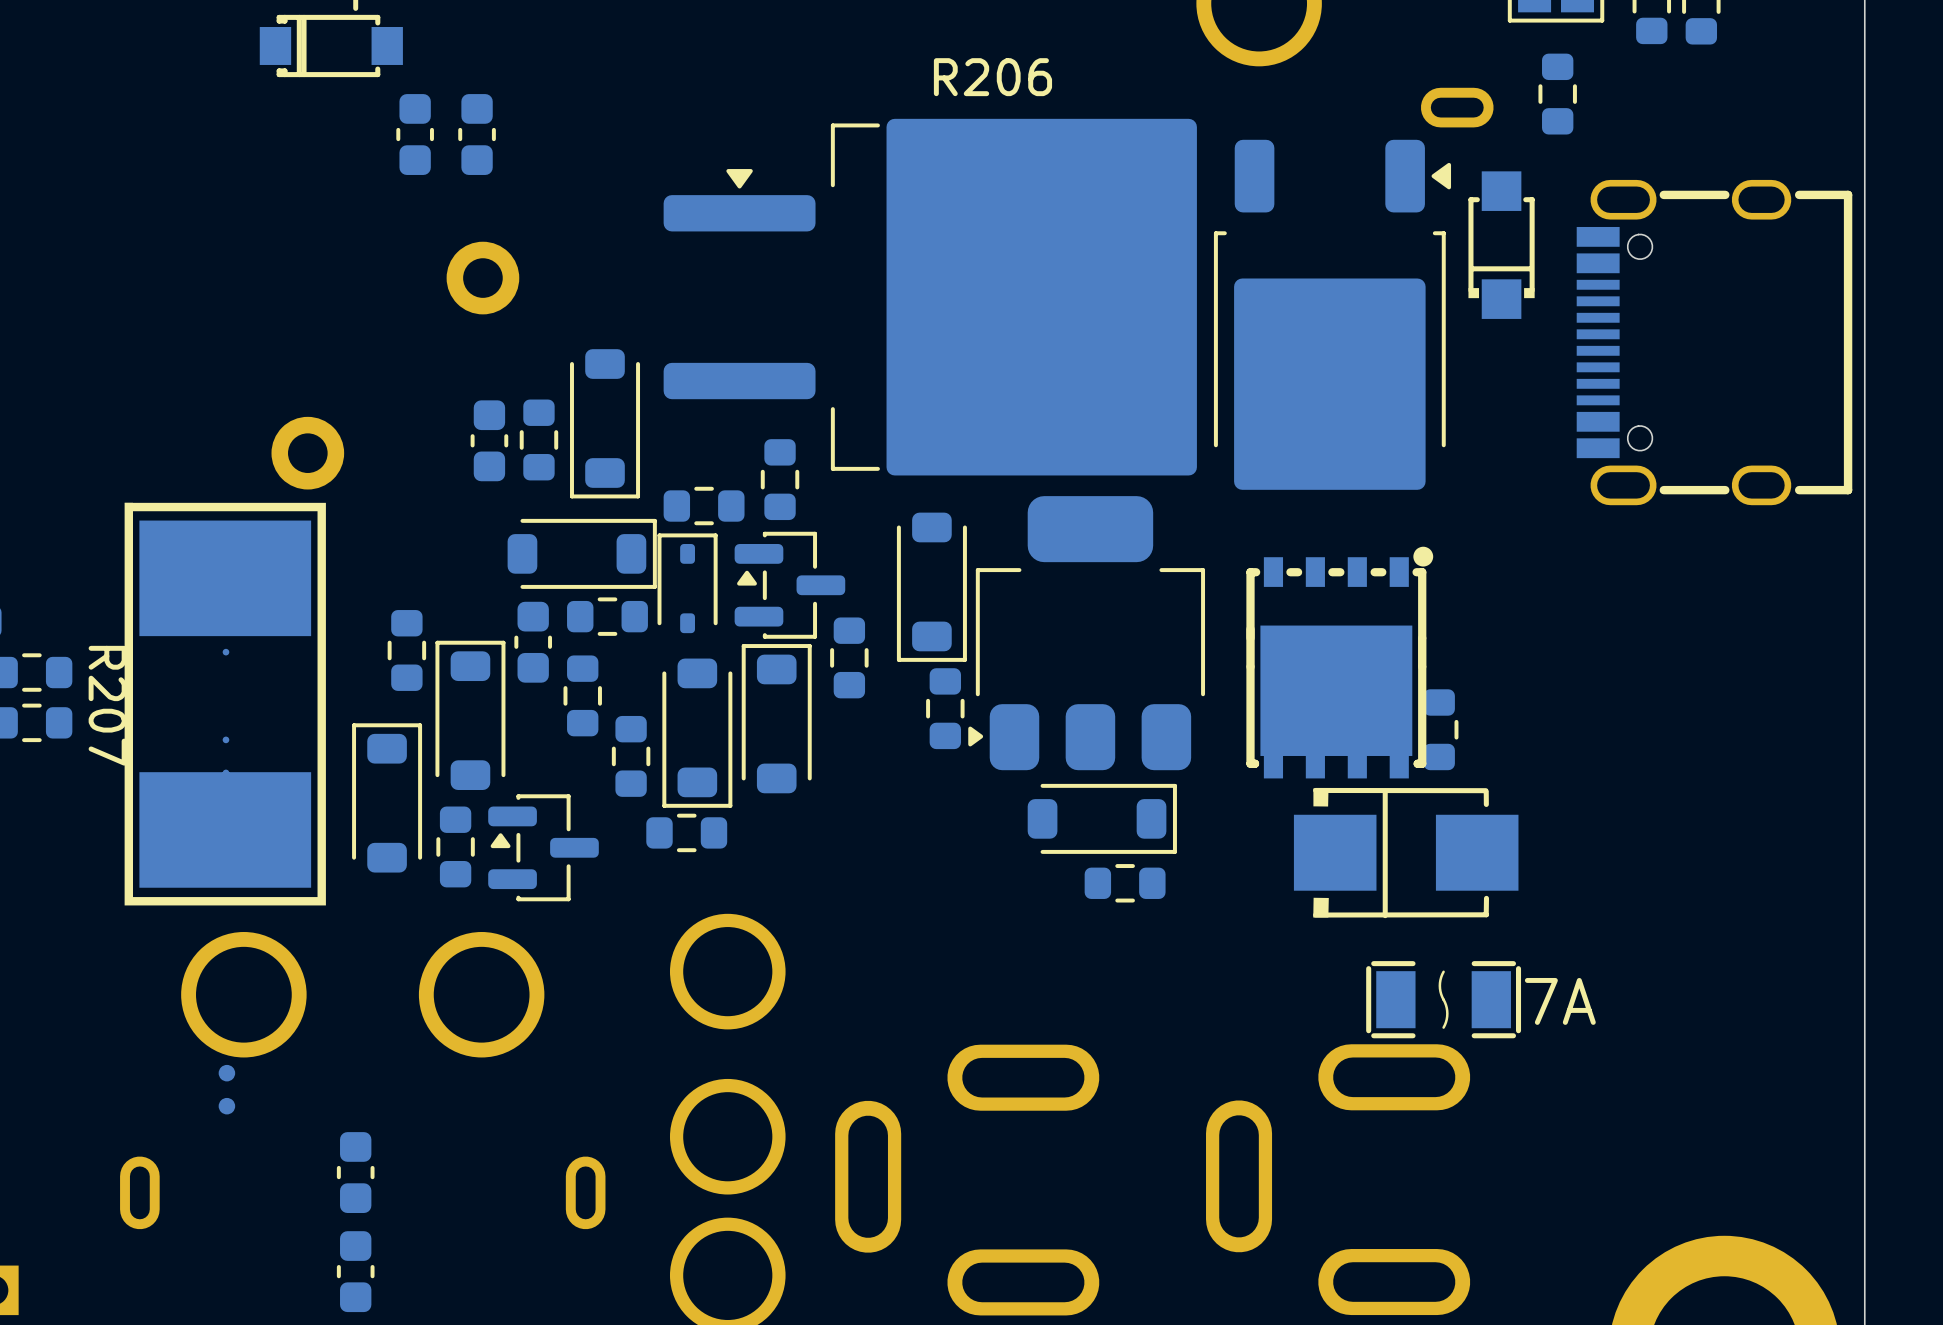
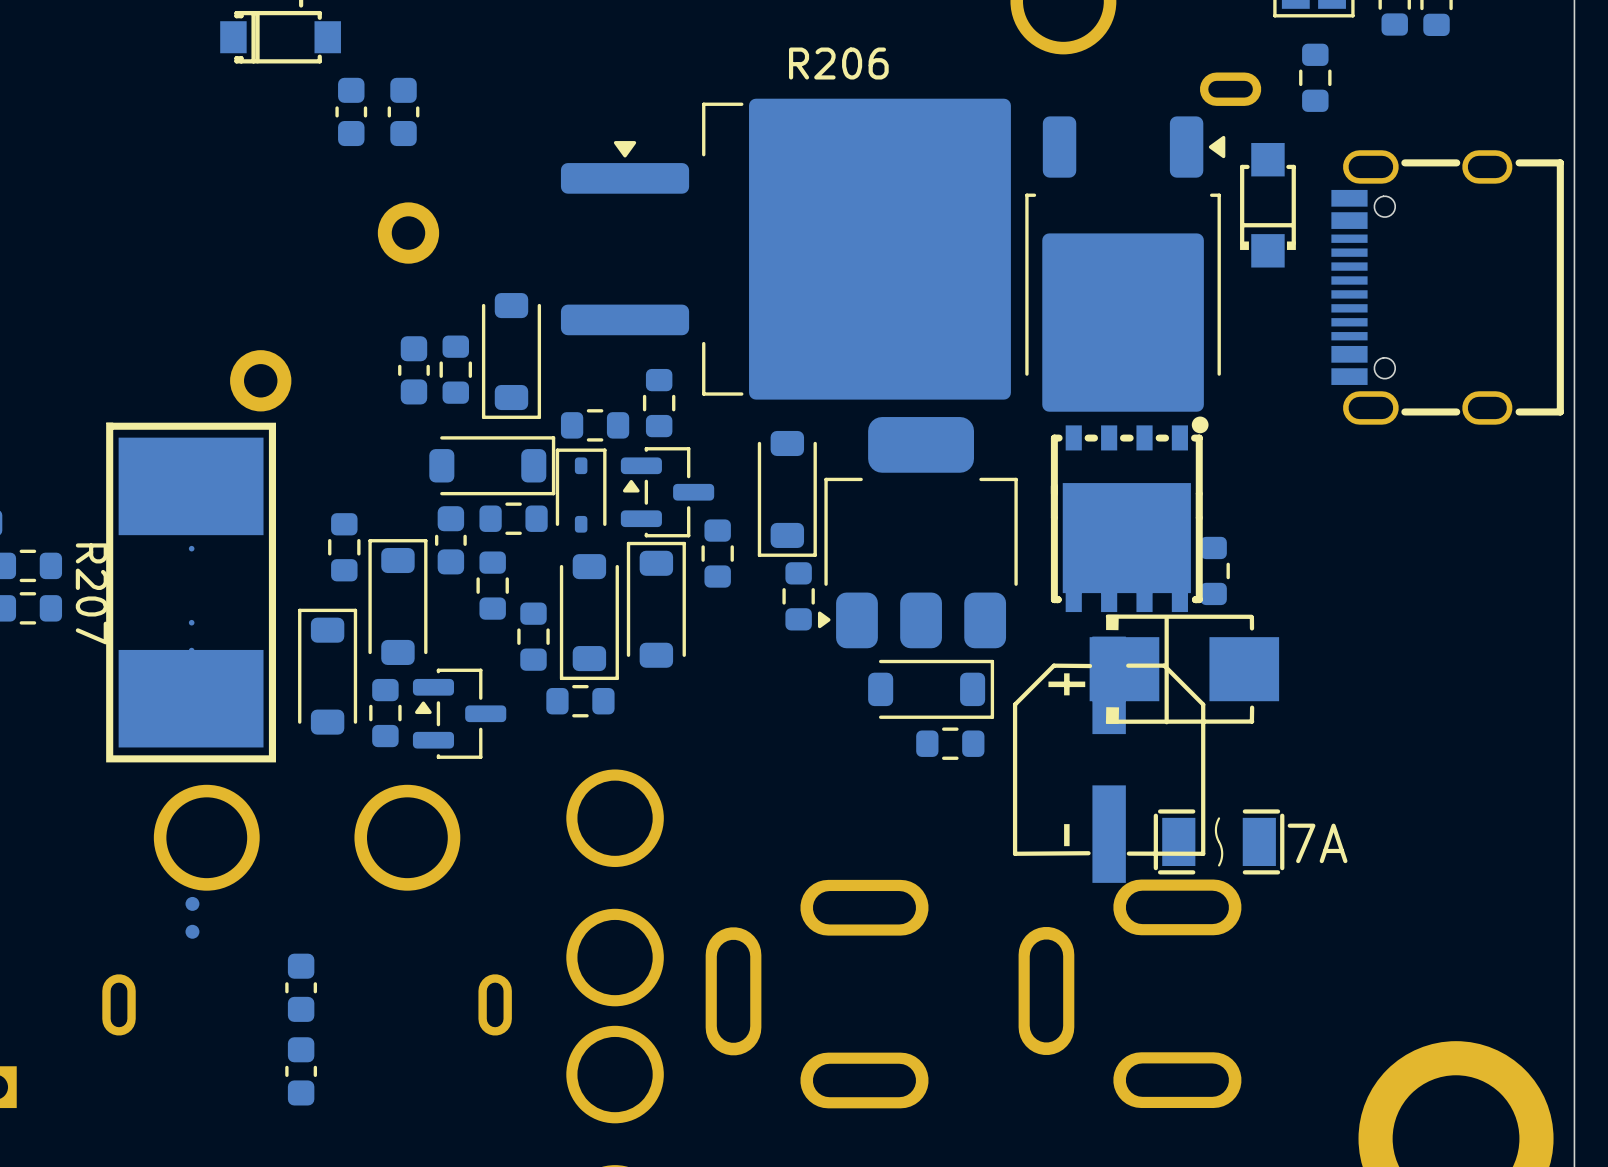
part position: (1339, 662) -> (1129, 514)
part position: (1439, 729) -> (1213, 570)
part position: (1406, 853) -> (1184, 669)
part: none -> (1109, 759)

